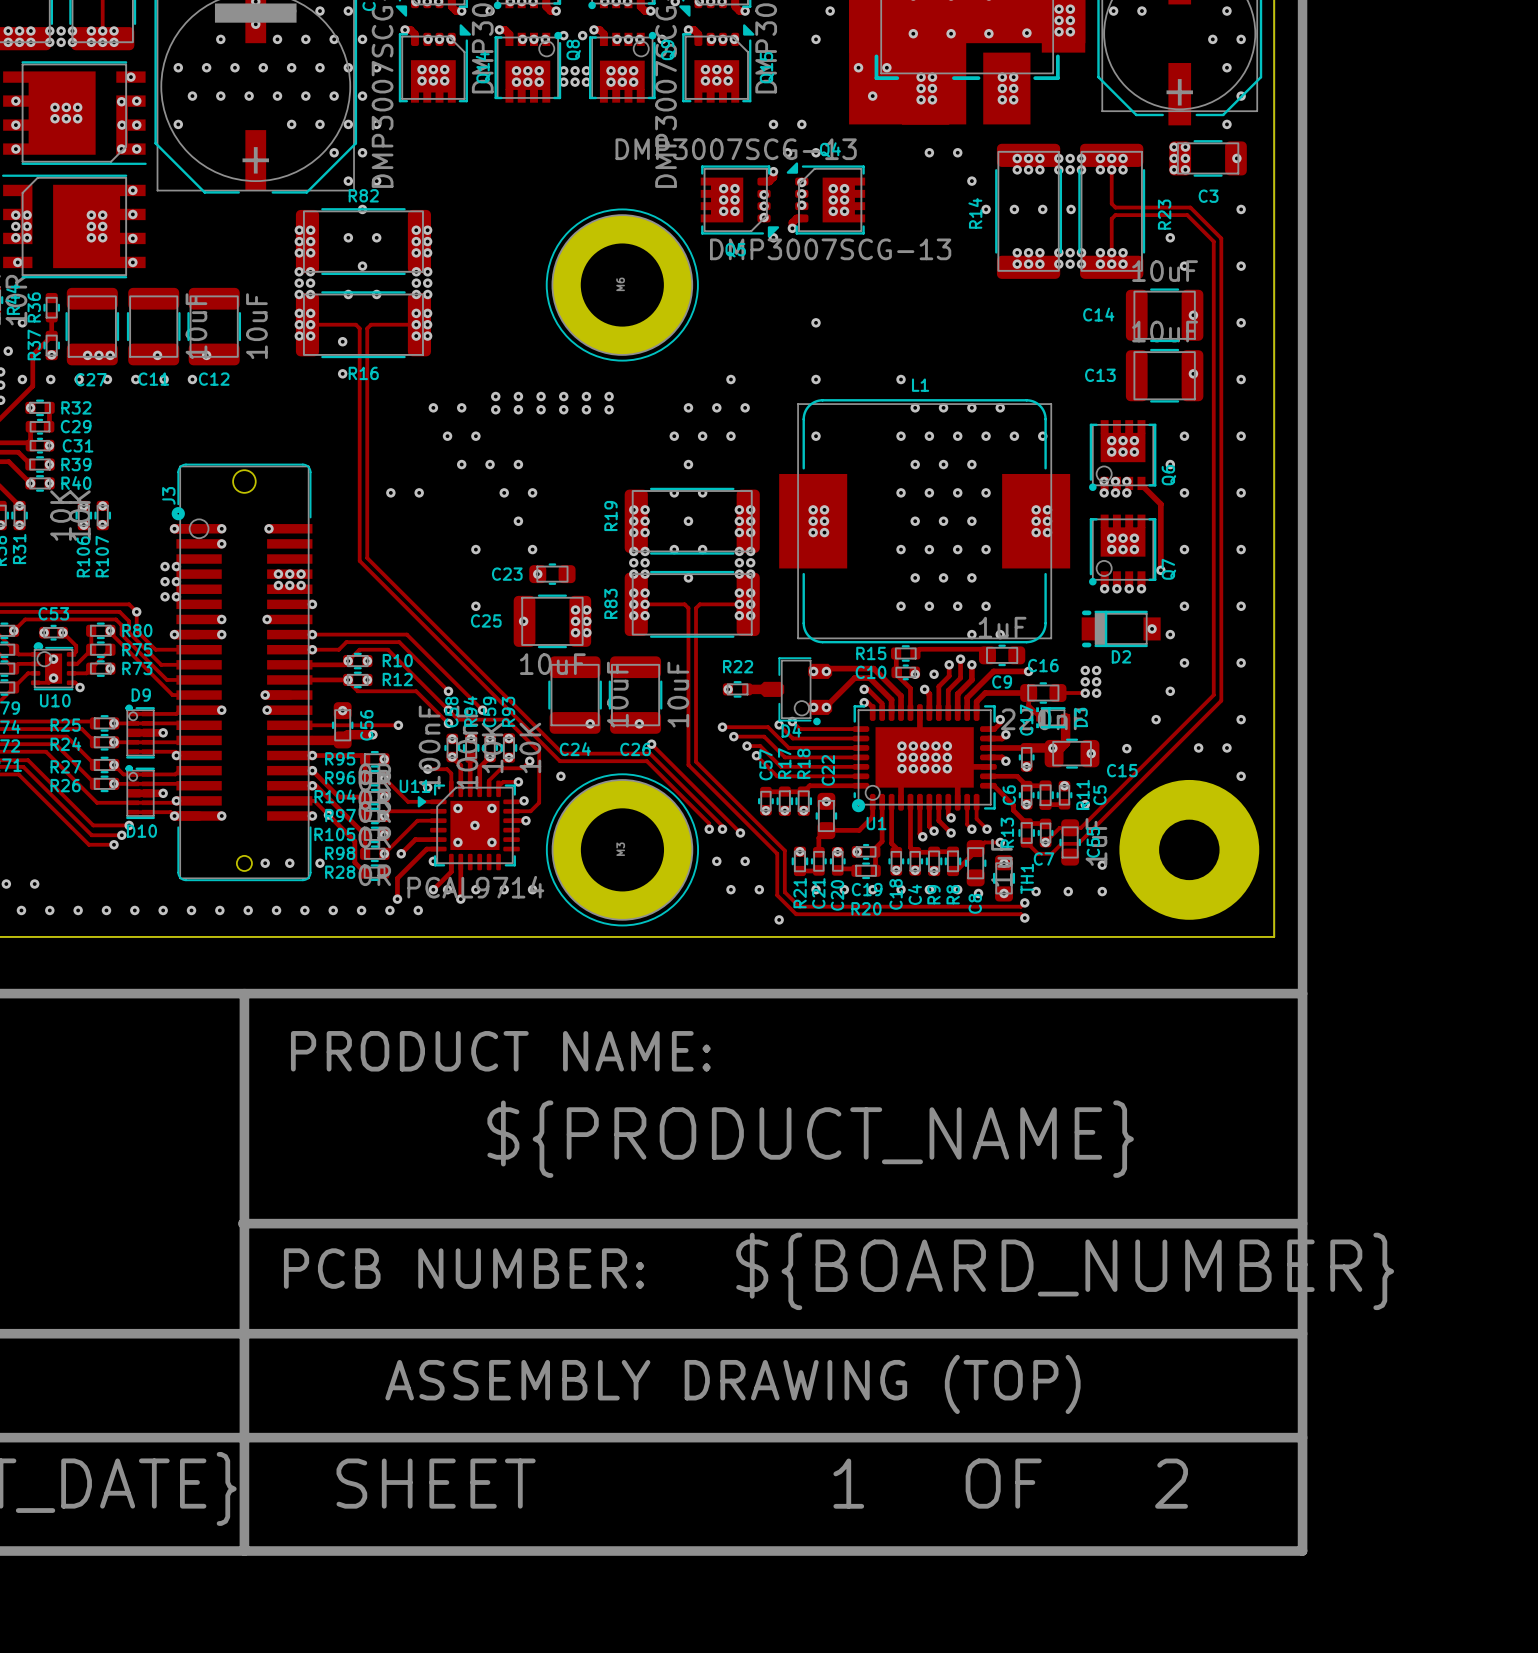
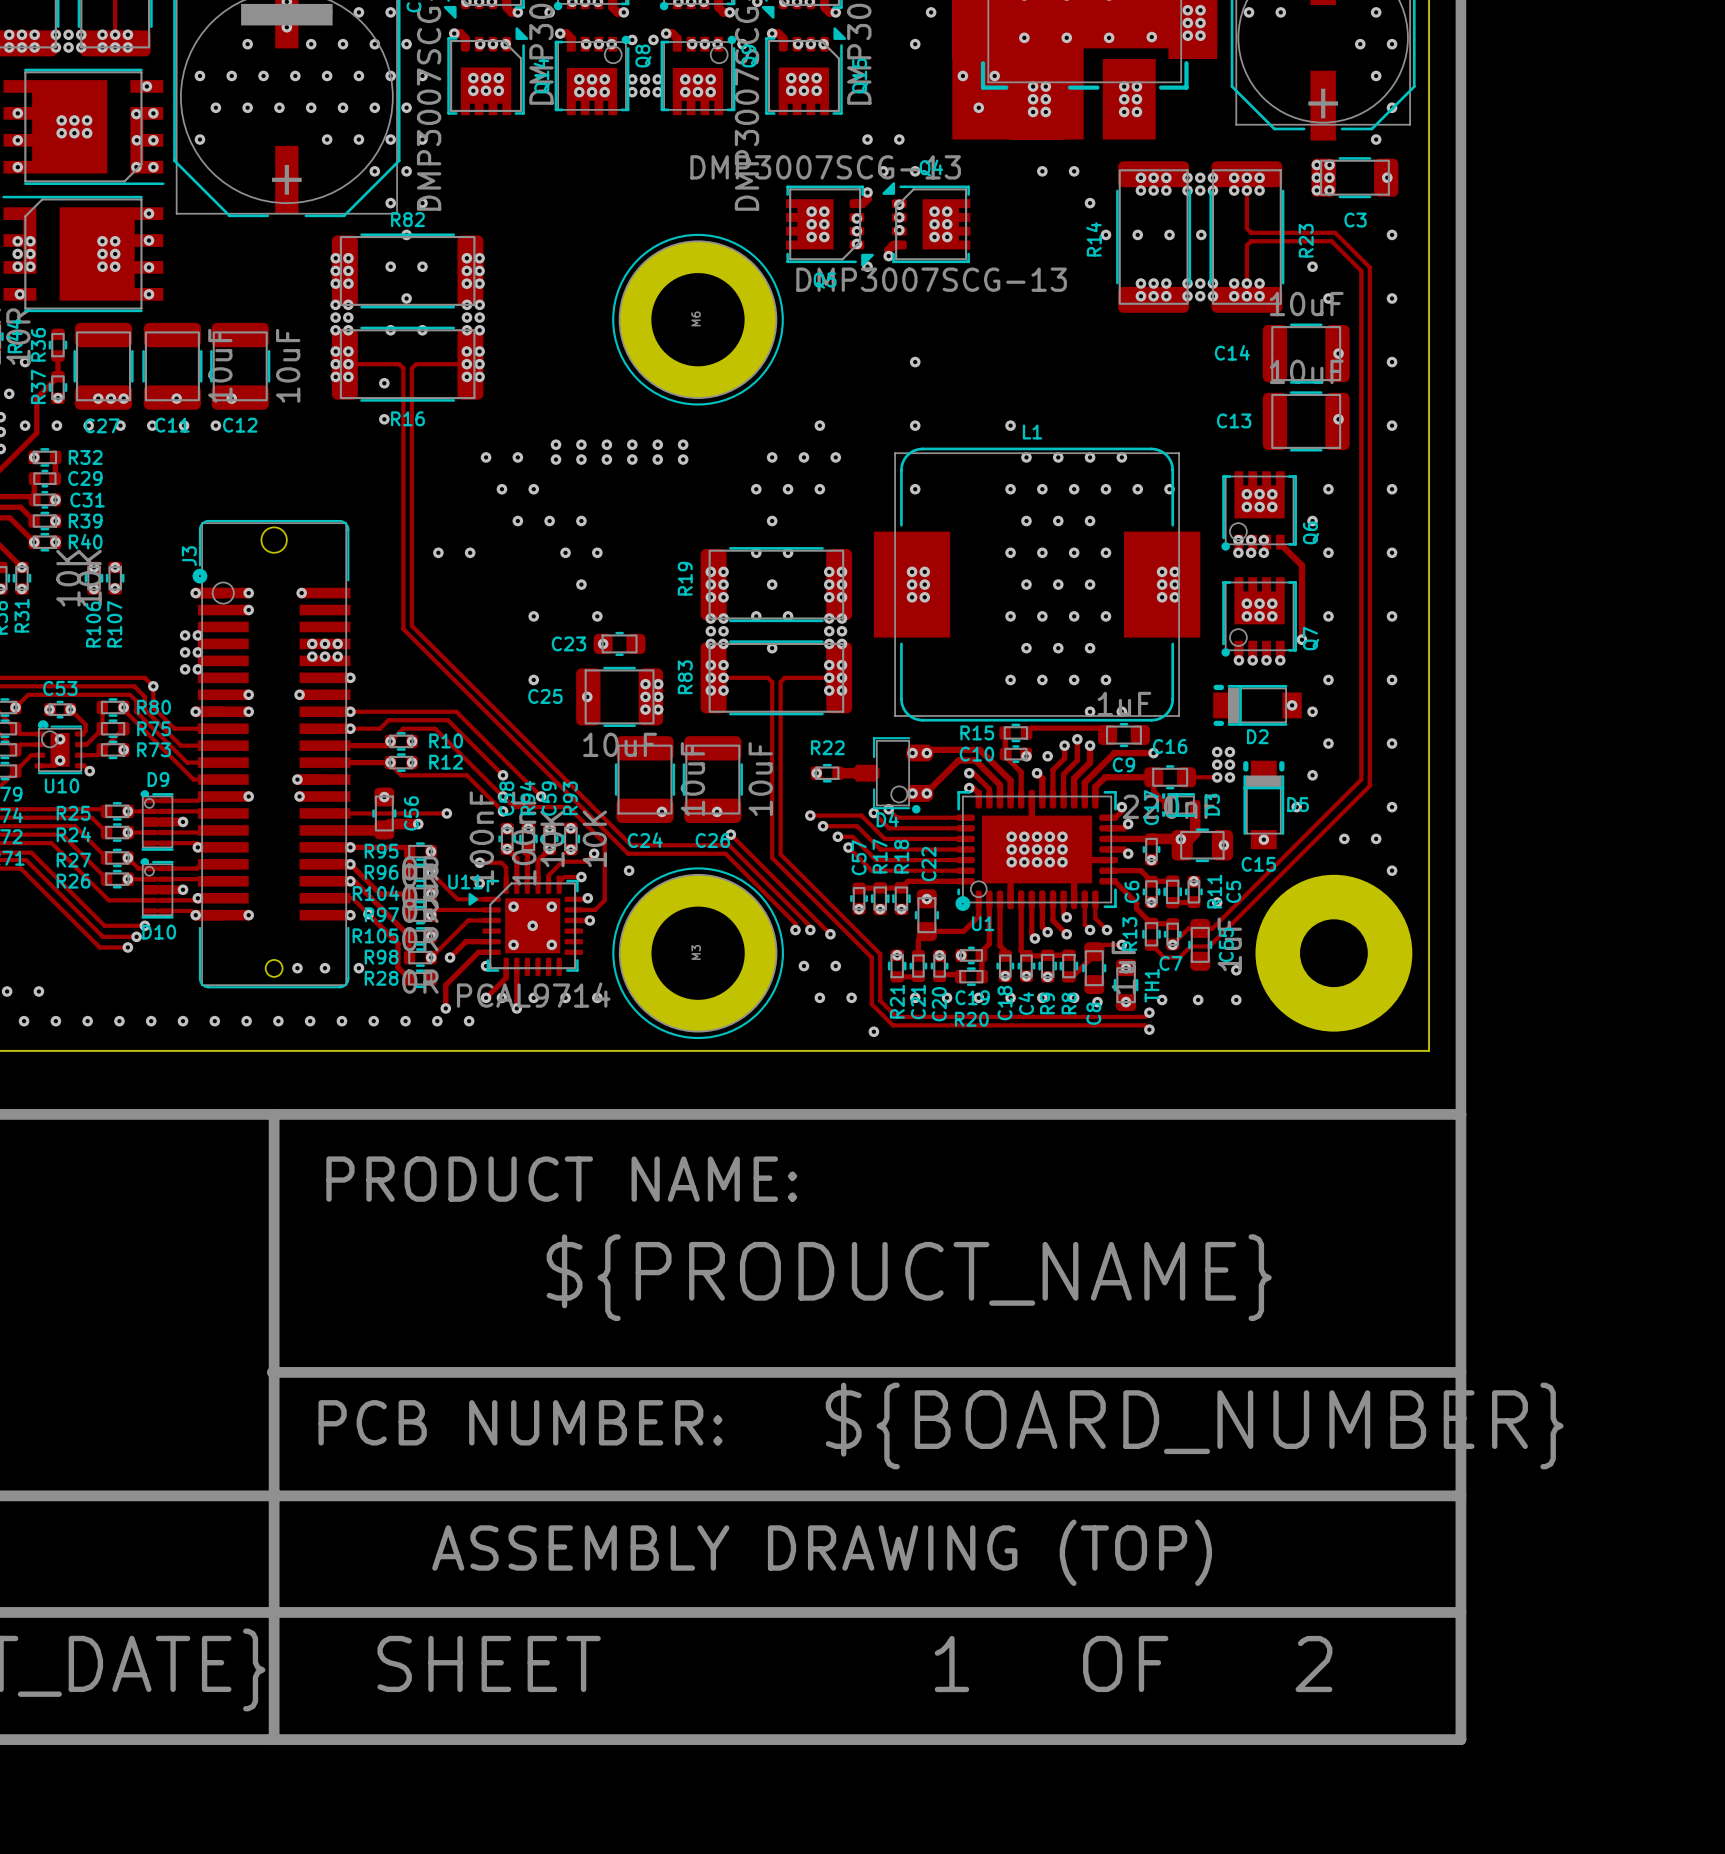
D5: none -> (1263, 805)

